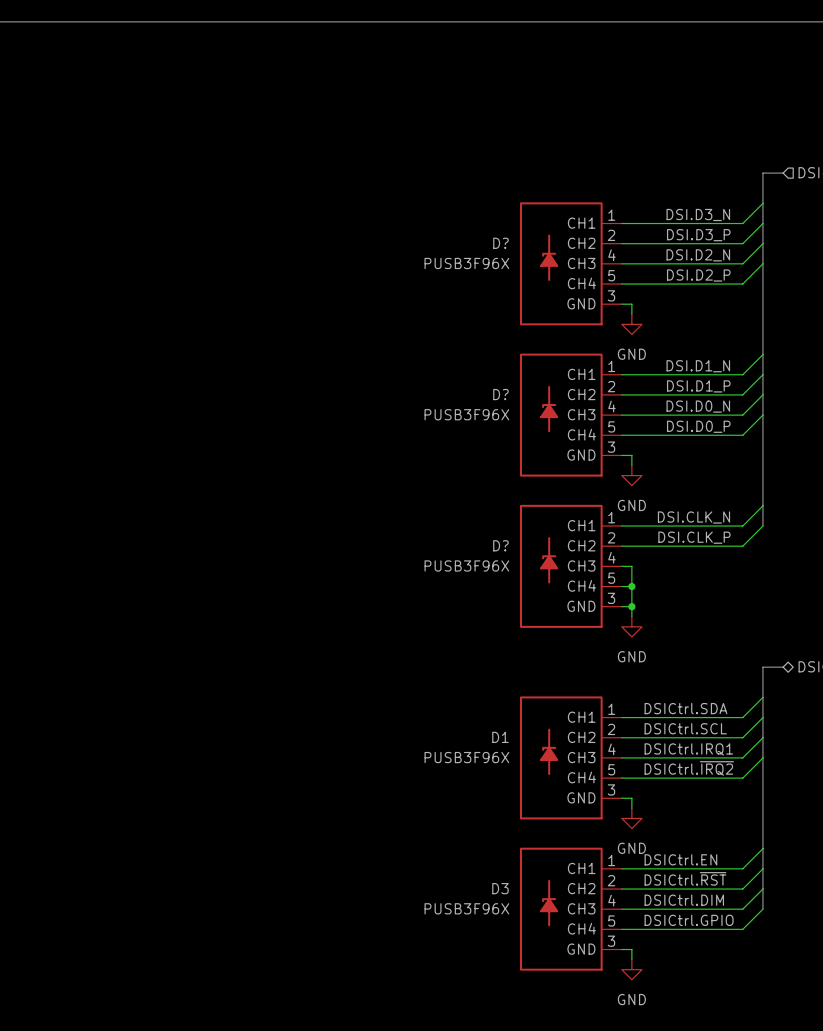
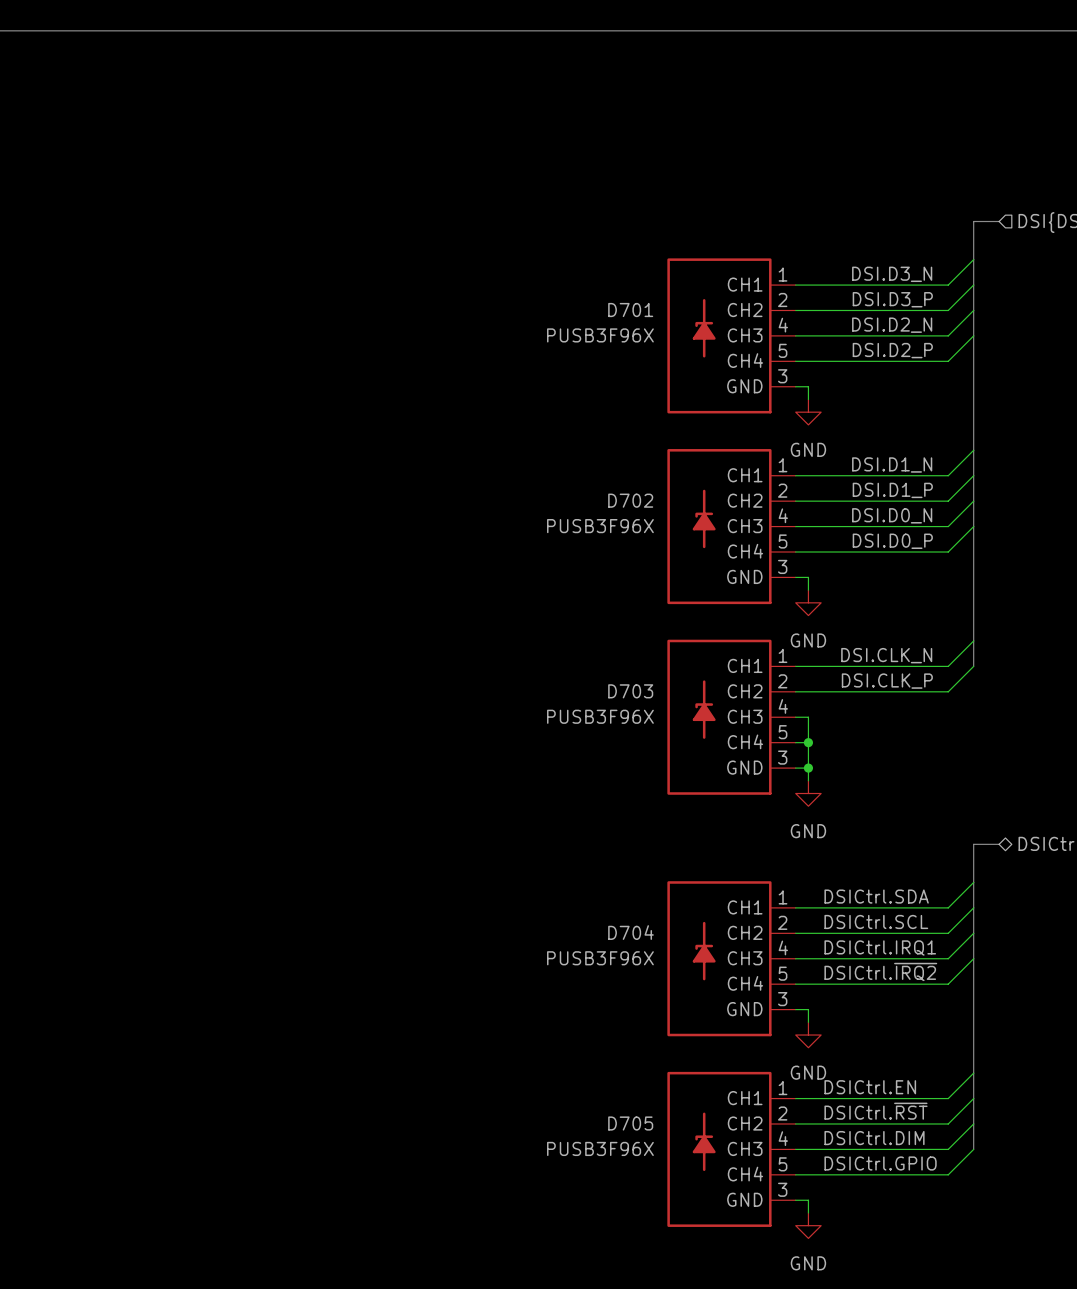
D? name: D? (500, 243) -> D701 (630, 310)
D? name: D? (500, 394) -> D702 (630, 500)
D? name: D? (500, 545) -> D703 (630, 691)
D1 name: D1 (500, 737) -> D704 (631, 932)
D3 name: D3 (500, 888) -> D705 (630, 1123)

